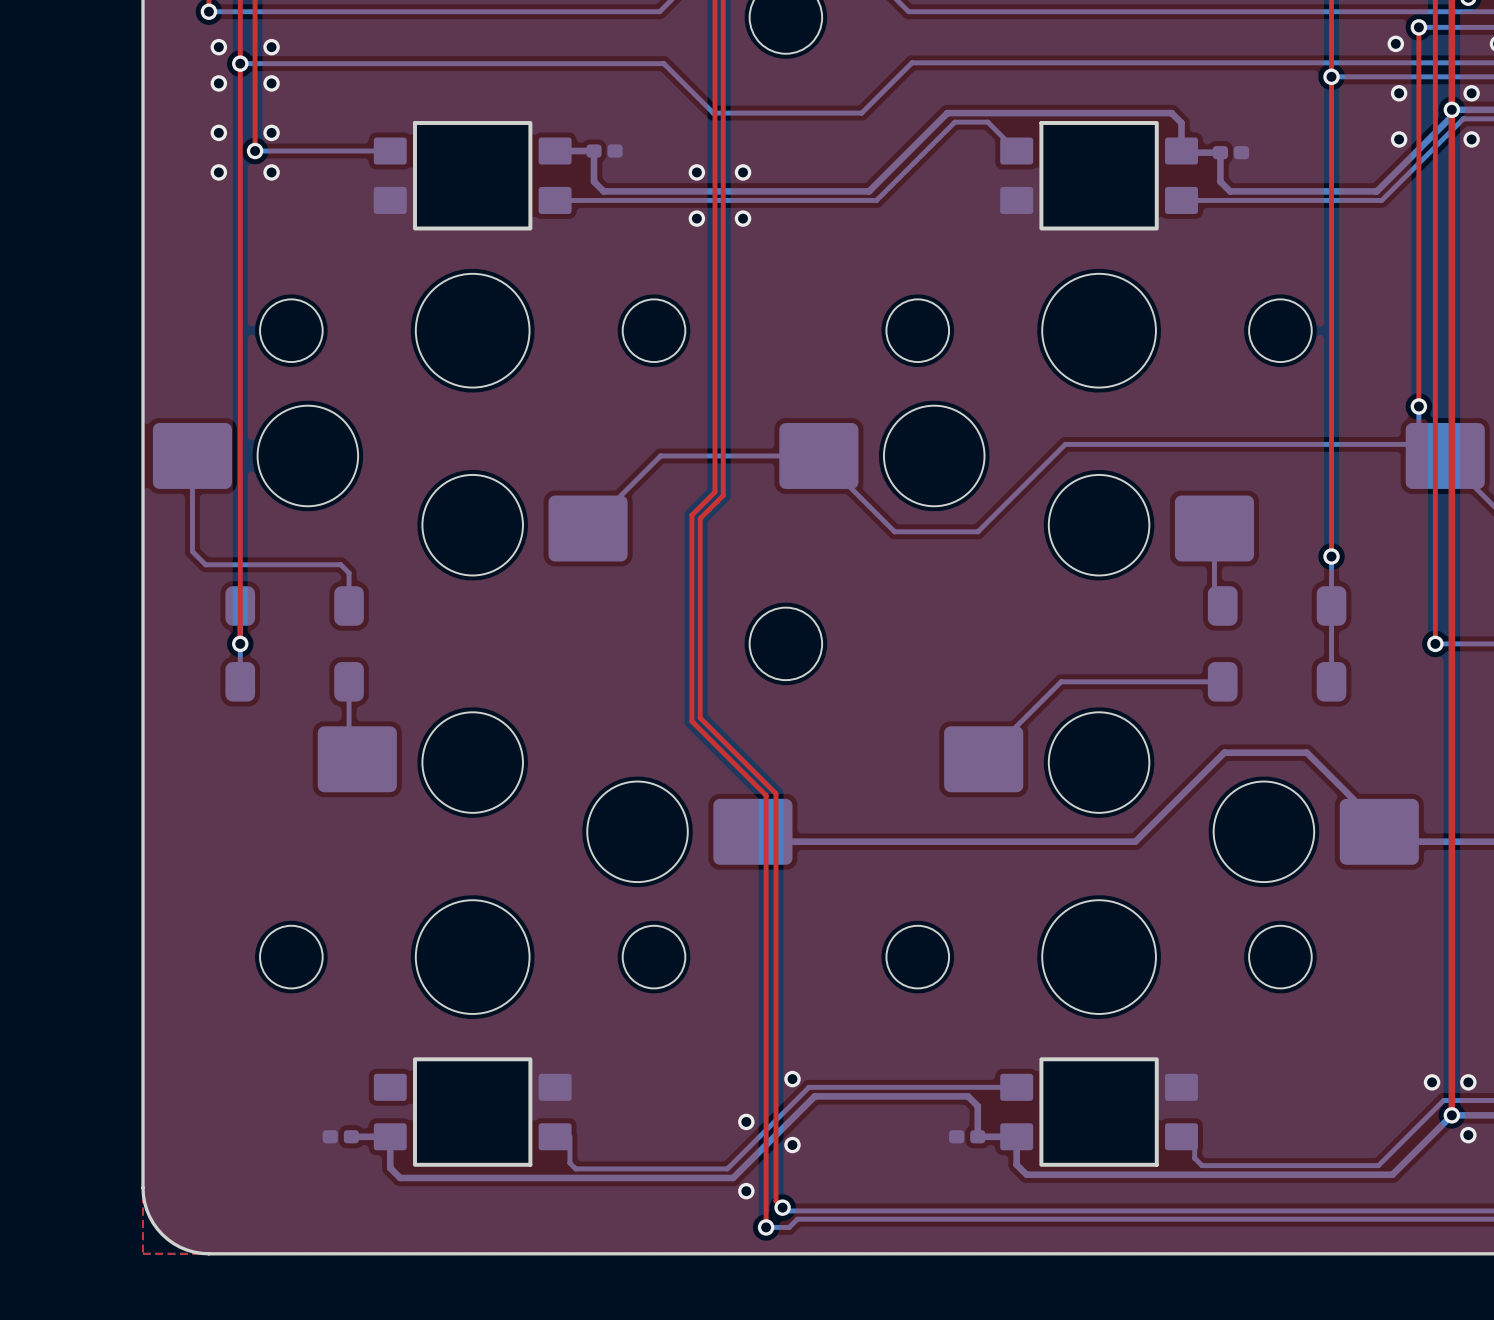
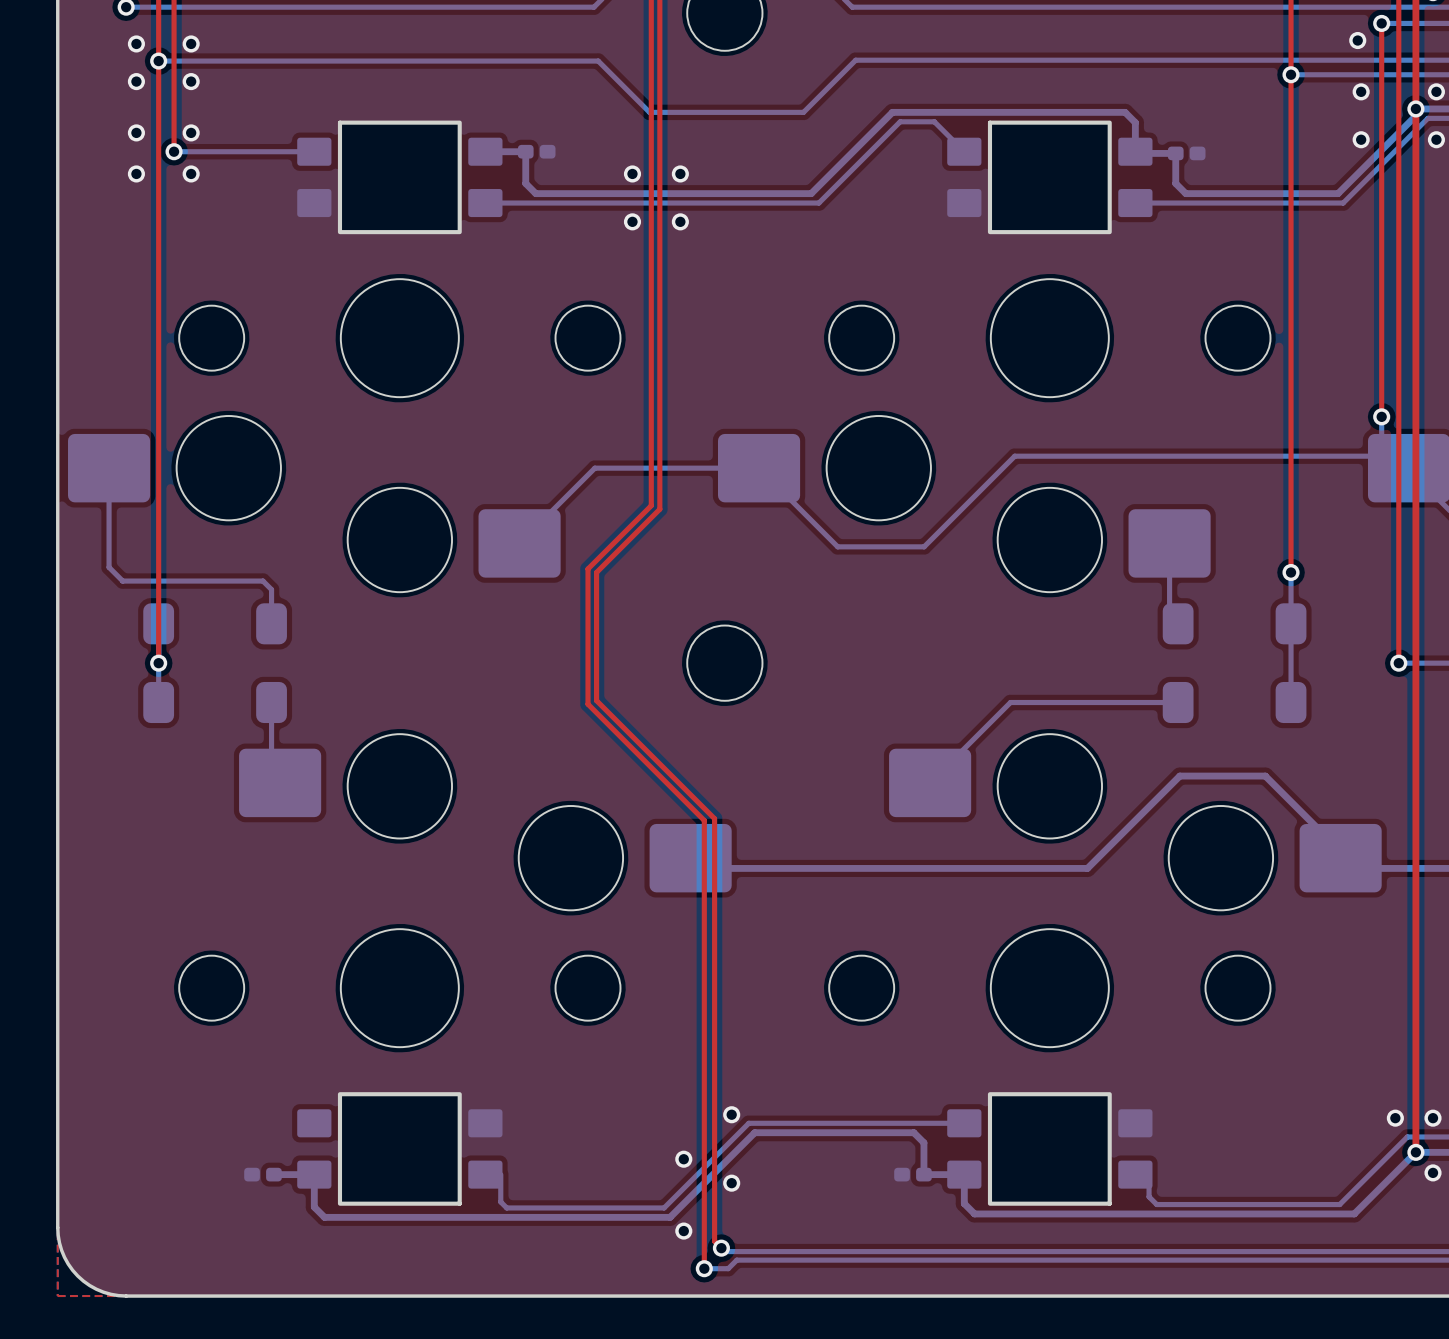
top track: (691, 515) (691, 721) -> (627, 529) (588, 568) (588, 704) (627, 743)
top track: (700, 518) (700, 717) -> (635, 533) (596, 572) (596, 700) (635, 740)

